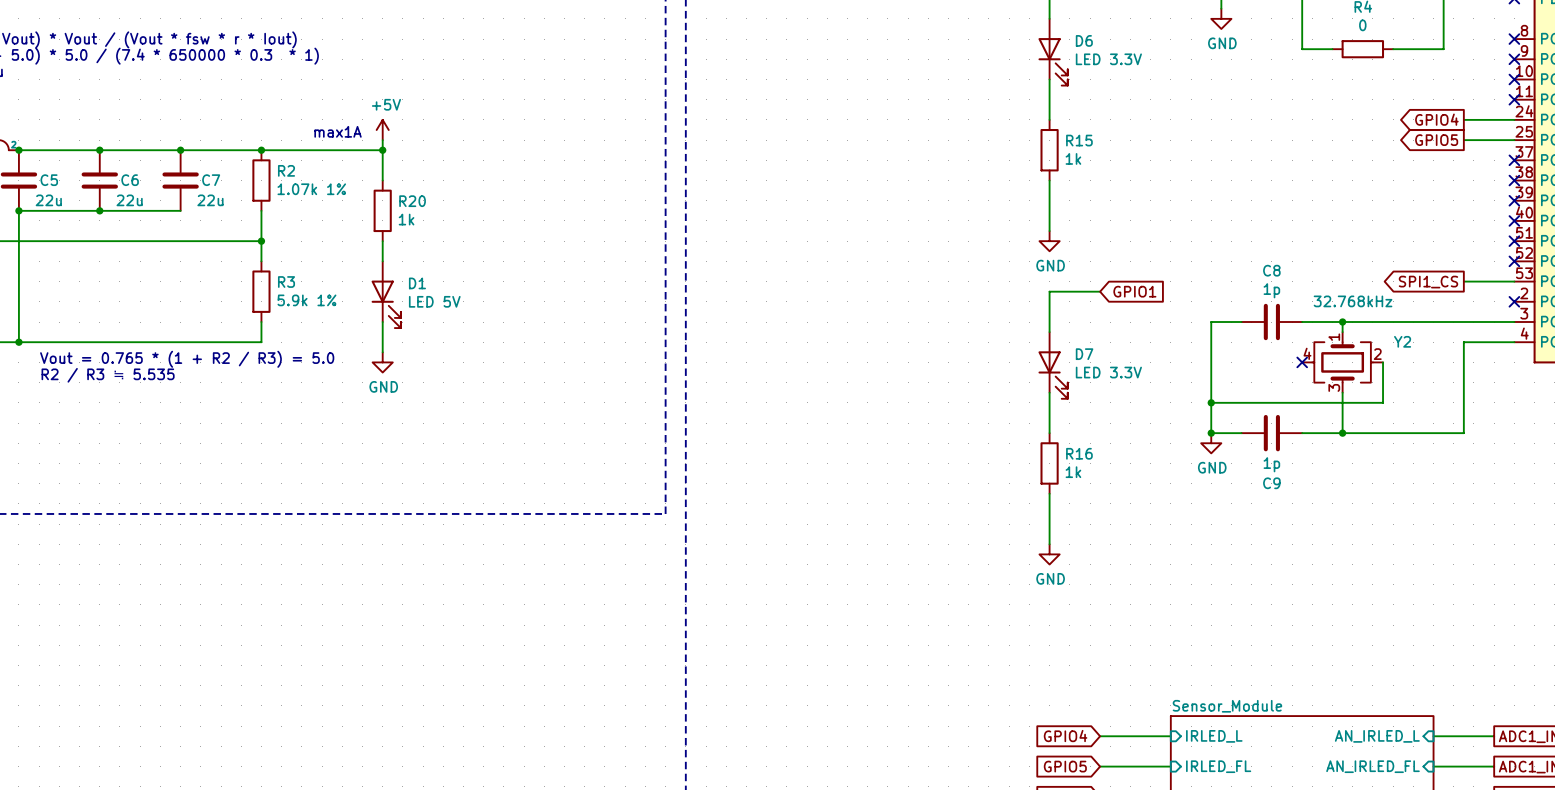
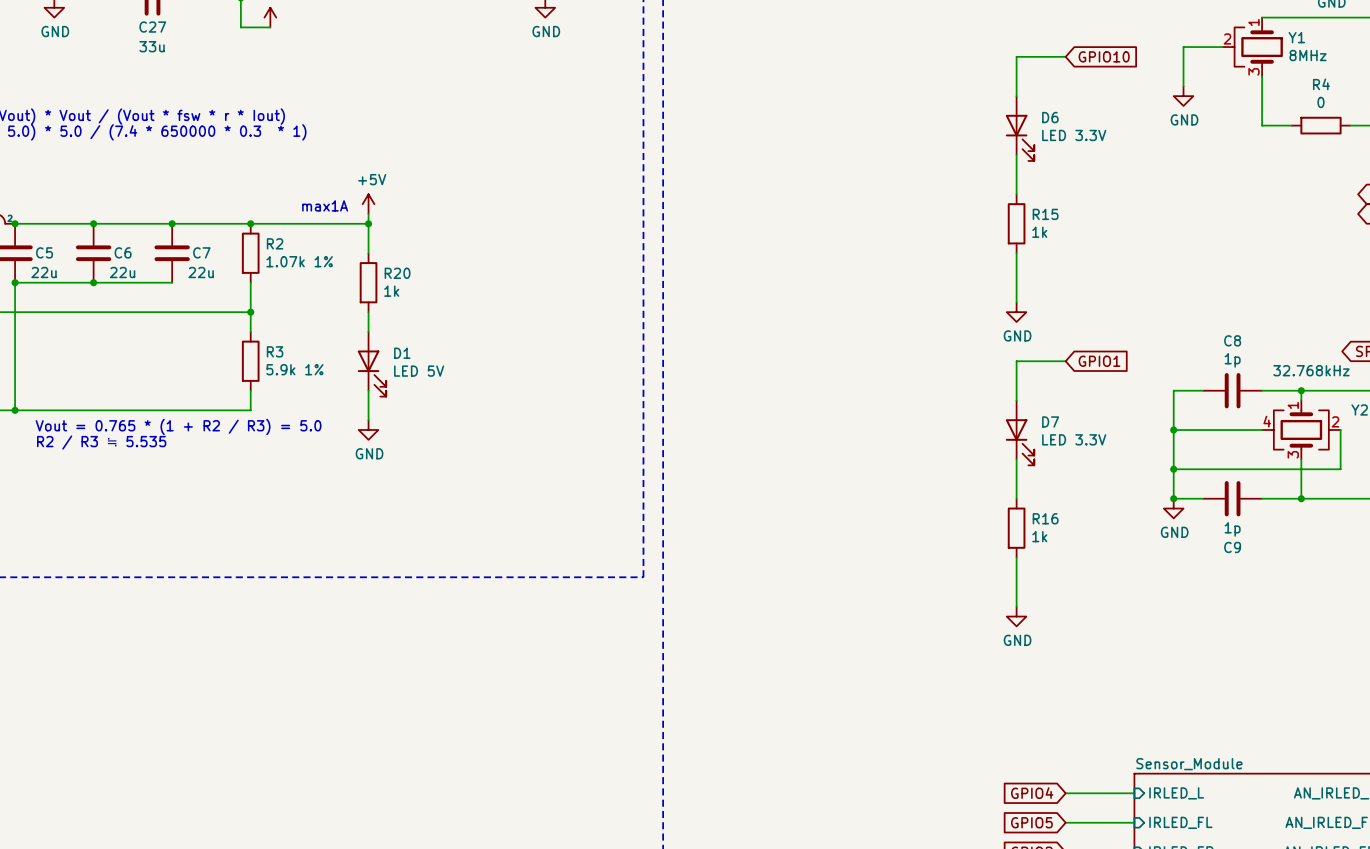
wire: none -> (1173, 429) (1262, 429)
junction: none -> (1173, 429)
no-connect mark: (1302, 362) -> none

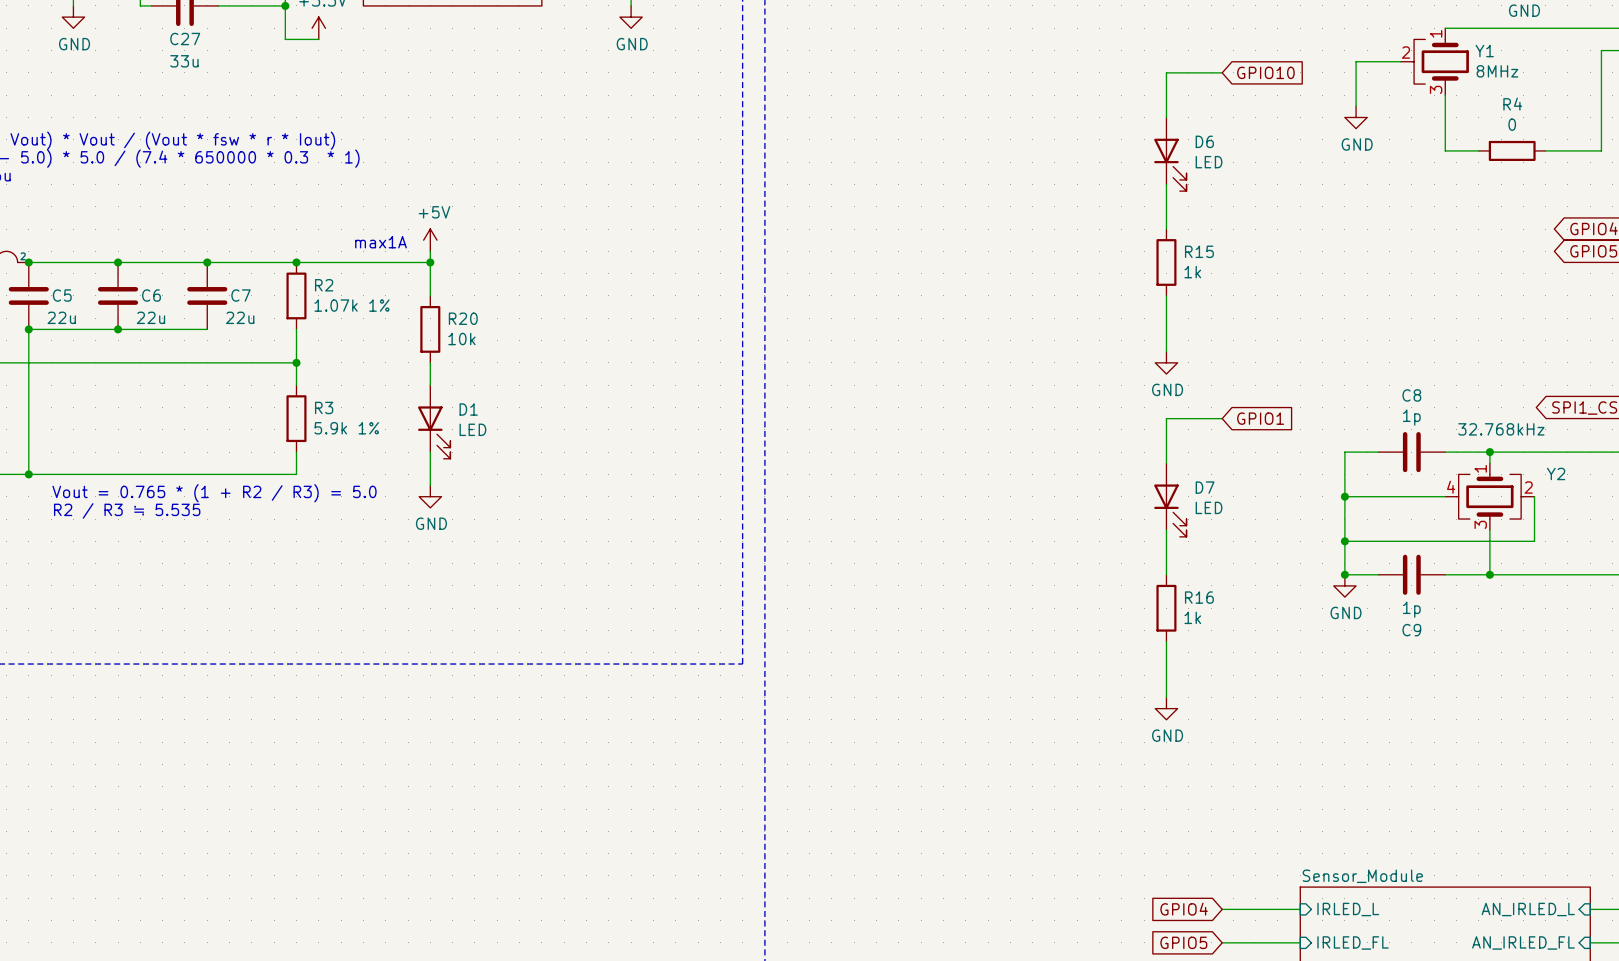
D6 value: LED 3.3V (1074, 135) -> LED (1209, 162)
R20 value: 1k (391, 291) -> 10k (461, 339)
D1 value: LED 5V (419, 371) -> LED (472, 429)
D7 value: LED 3.3V (1074, 439) -> LED (1209, 507)

